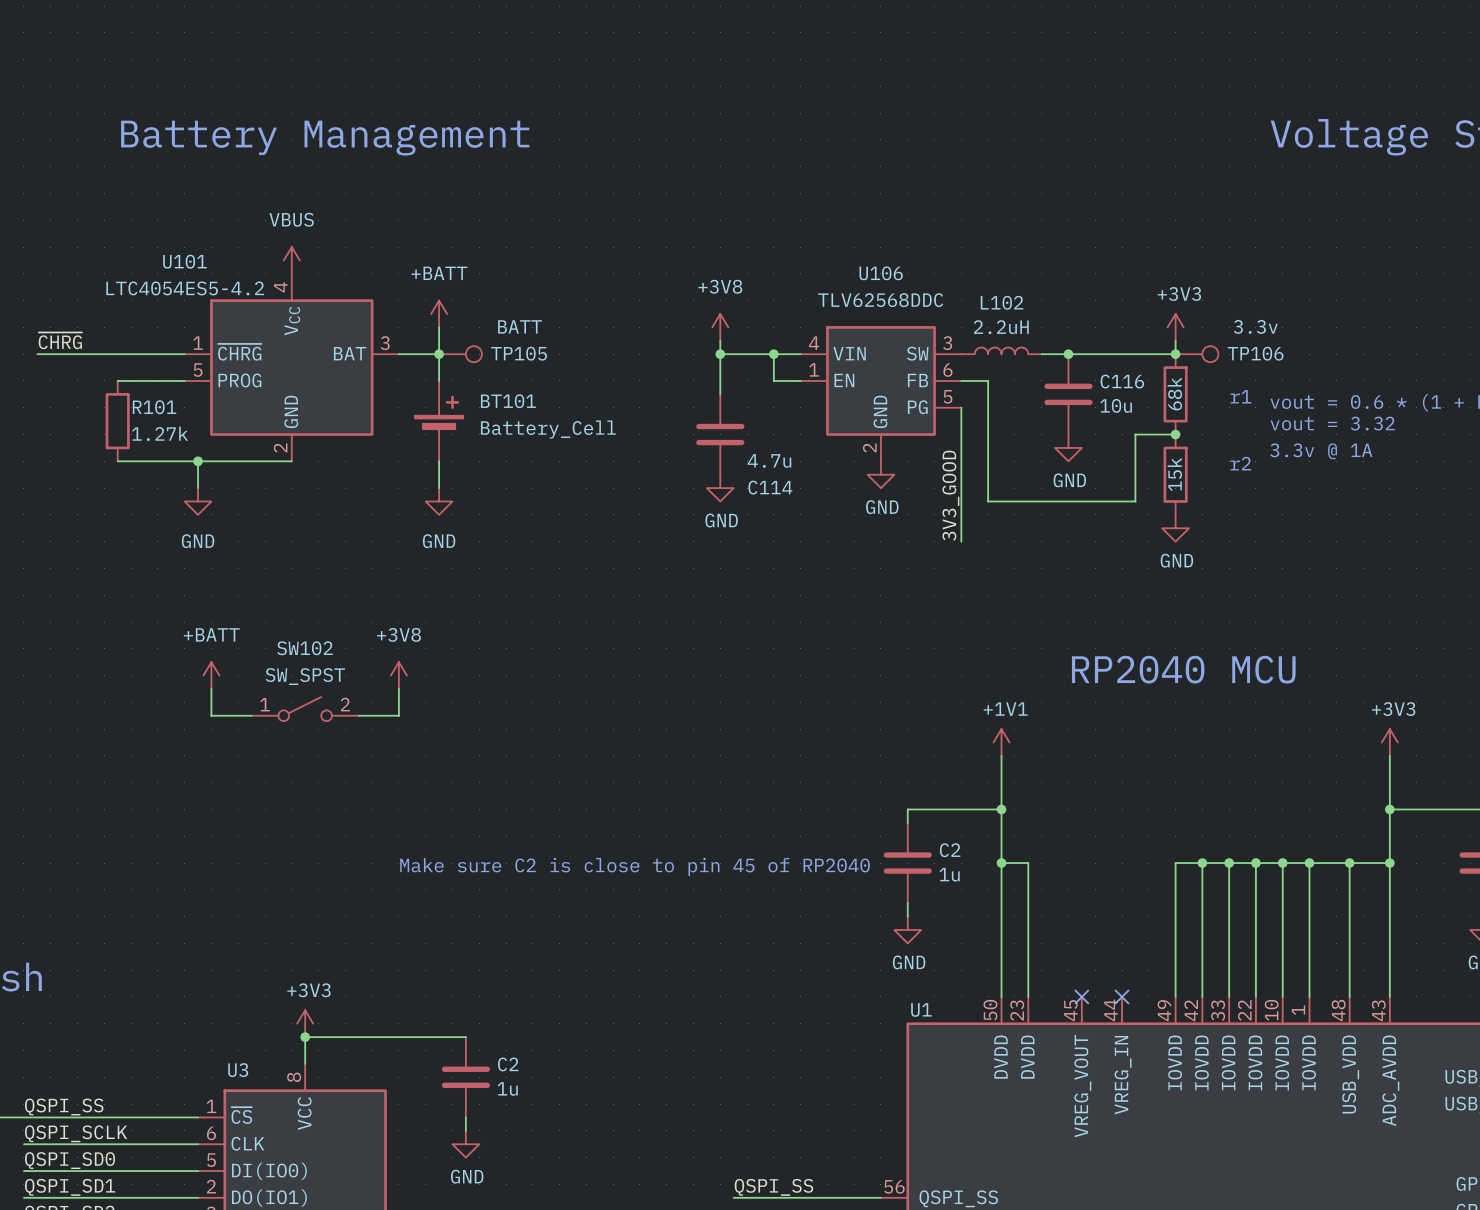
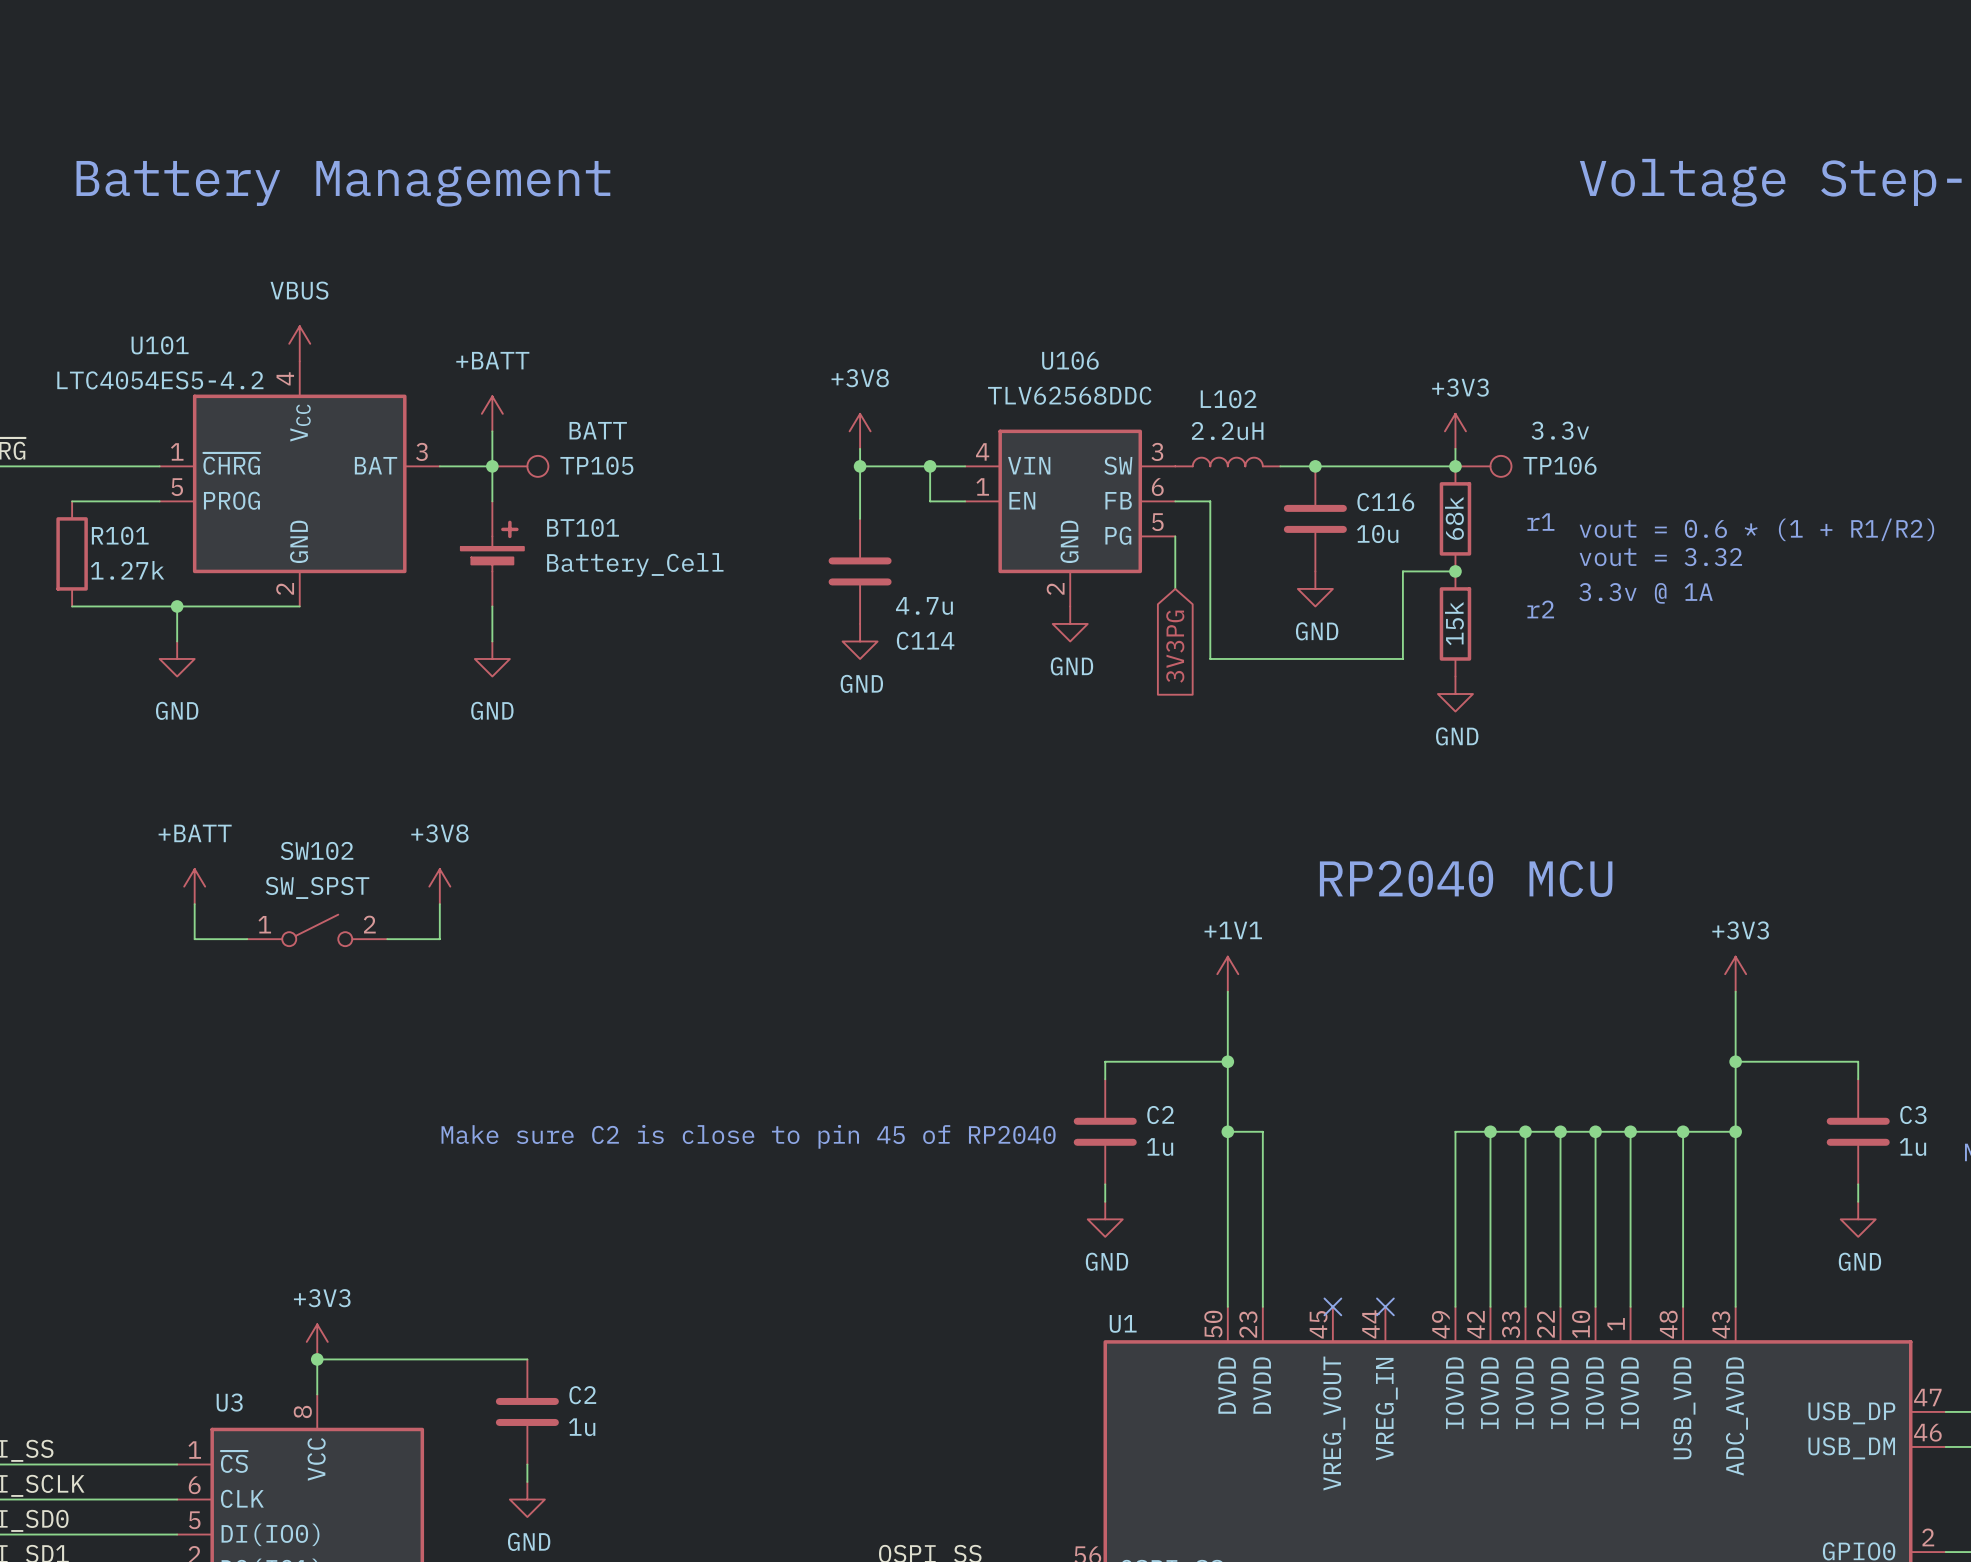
wire: (961, 447) (961, 541) -> none
global label: none -> 3V3PG (1175, 646)
label: 3V3_GOOD (950, 495) -> none

